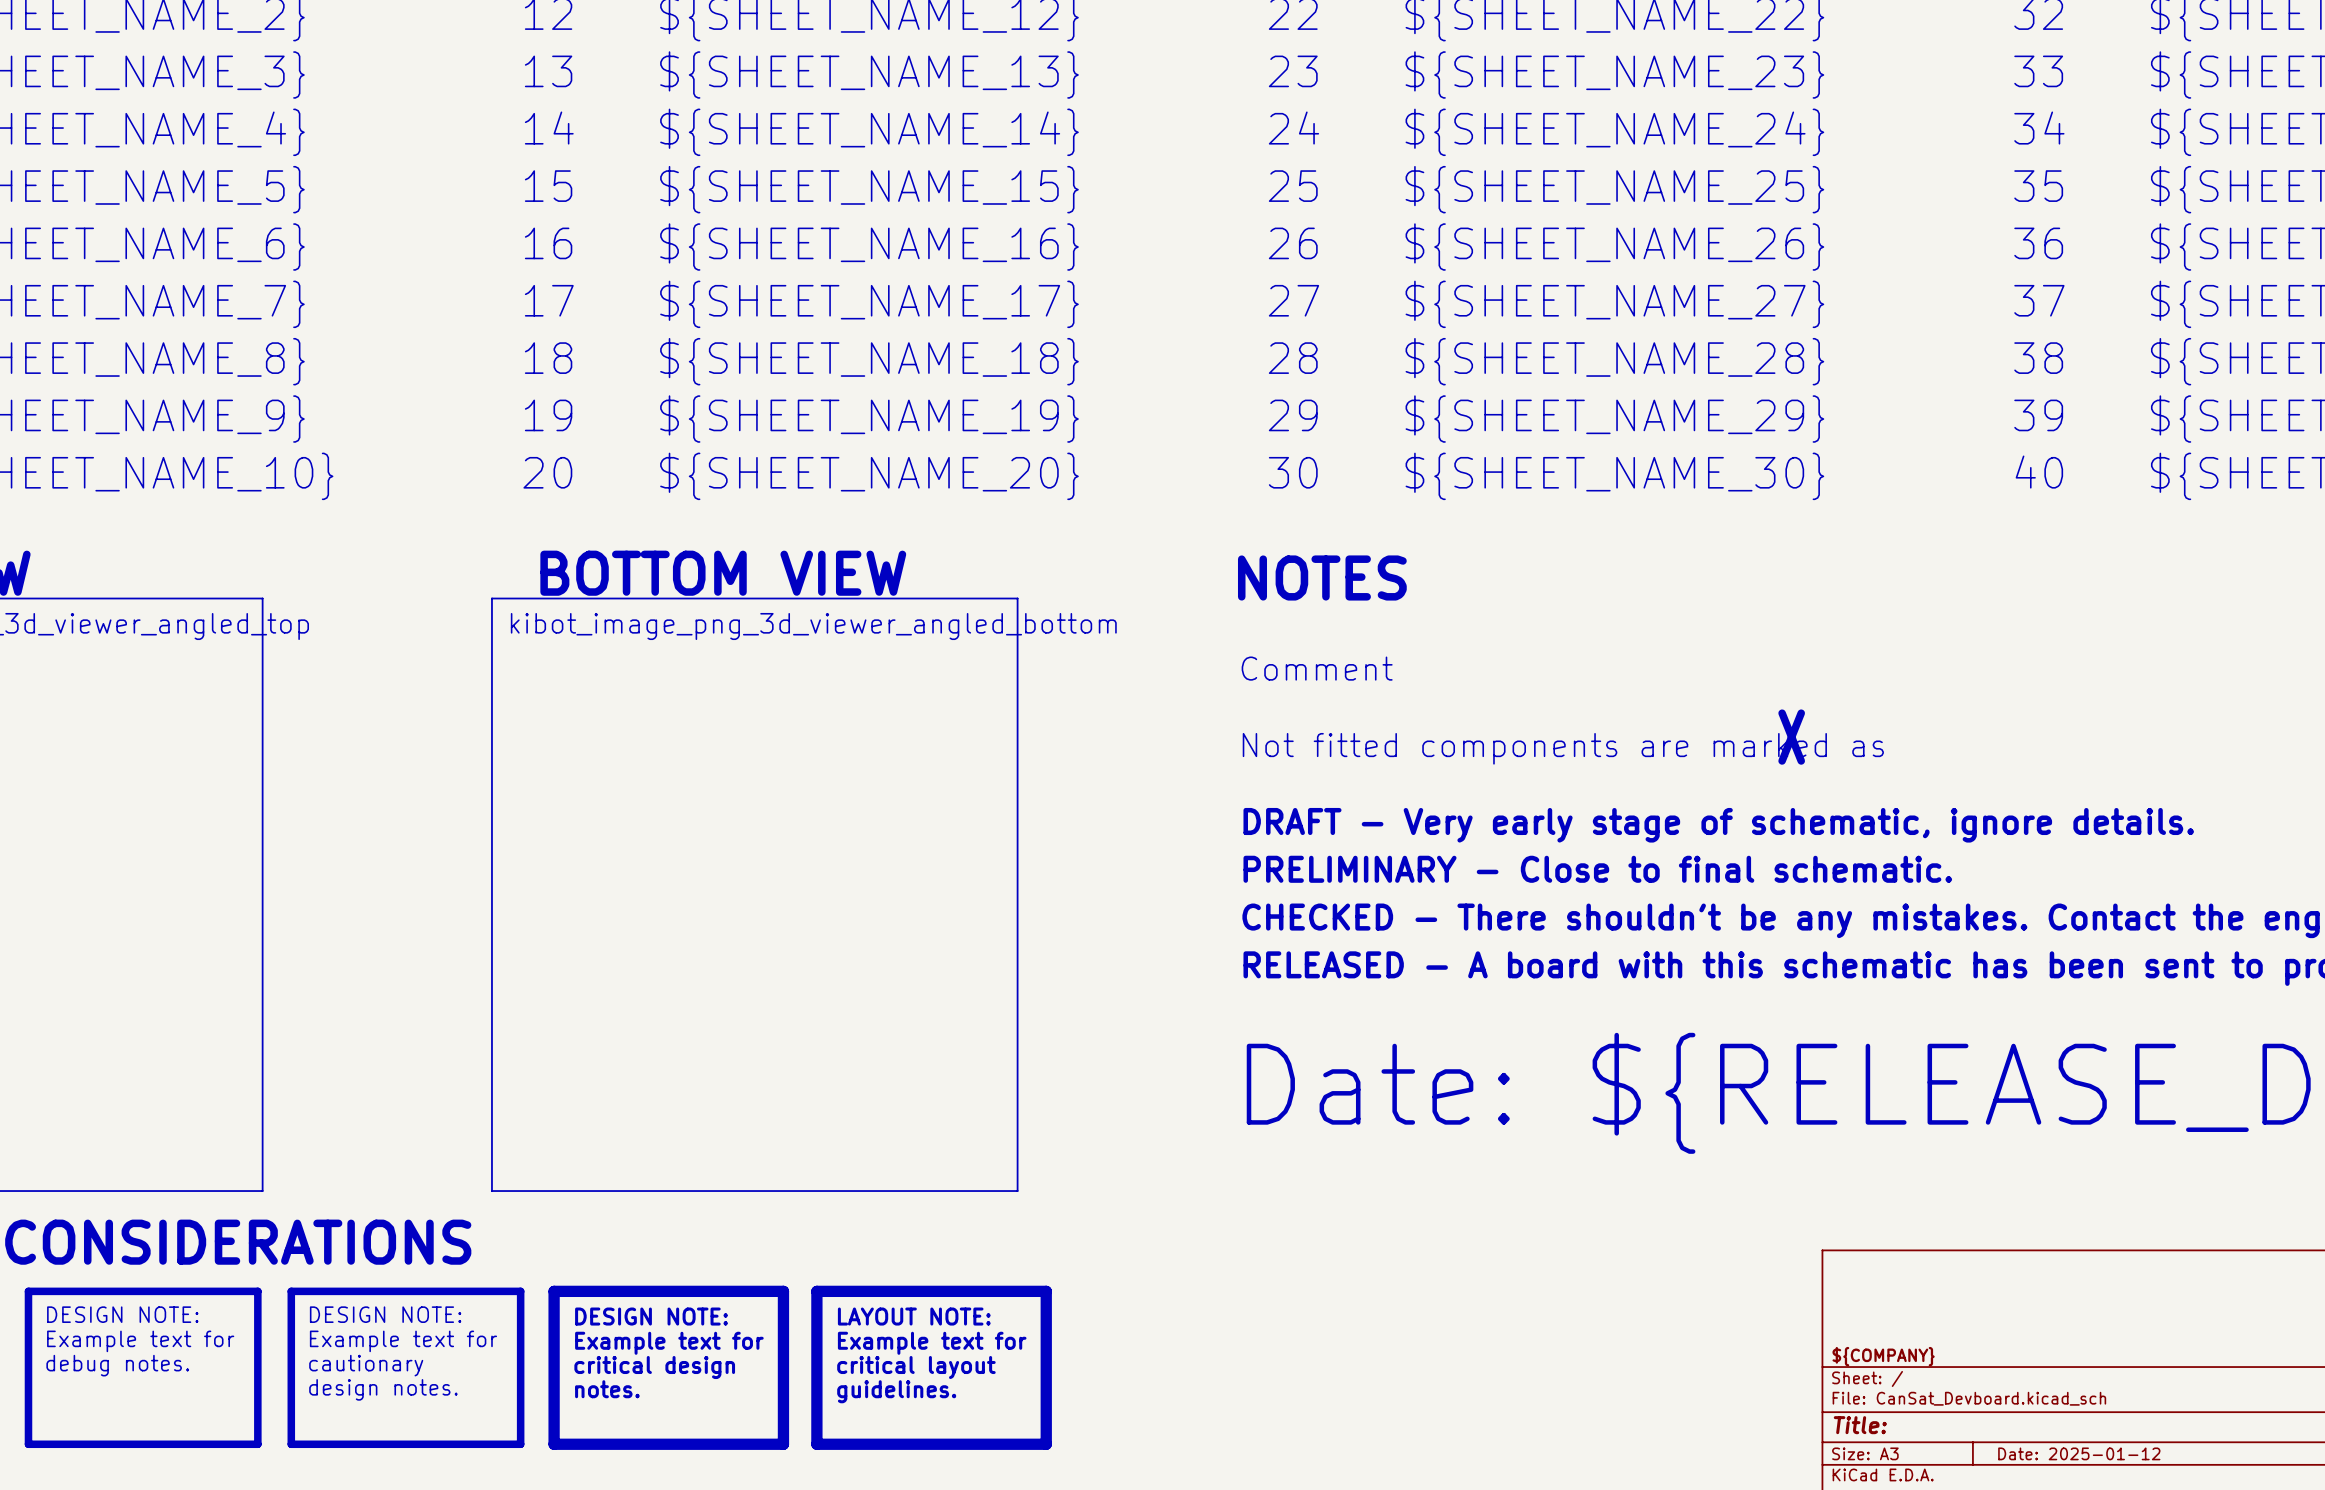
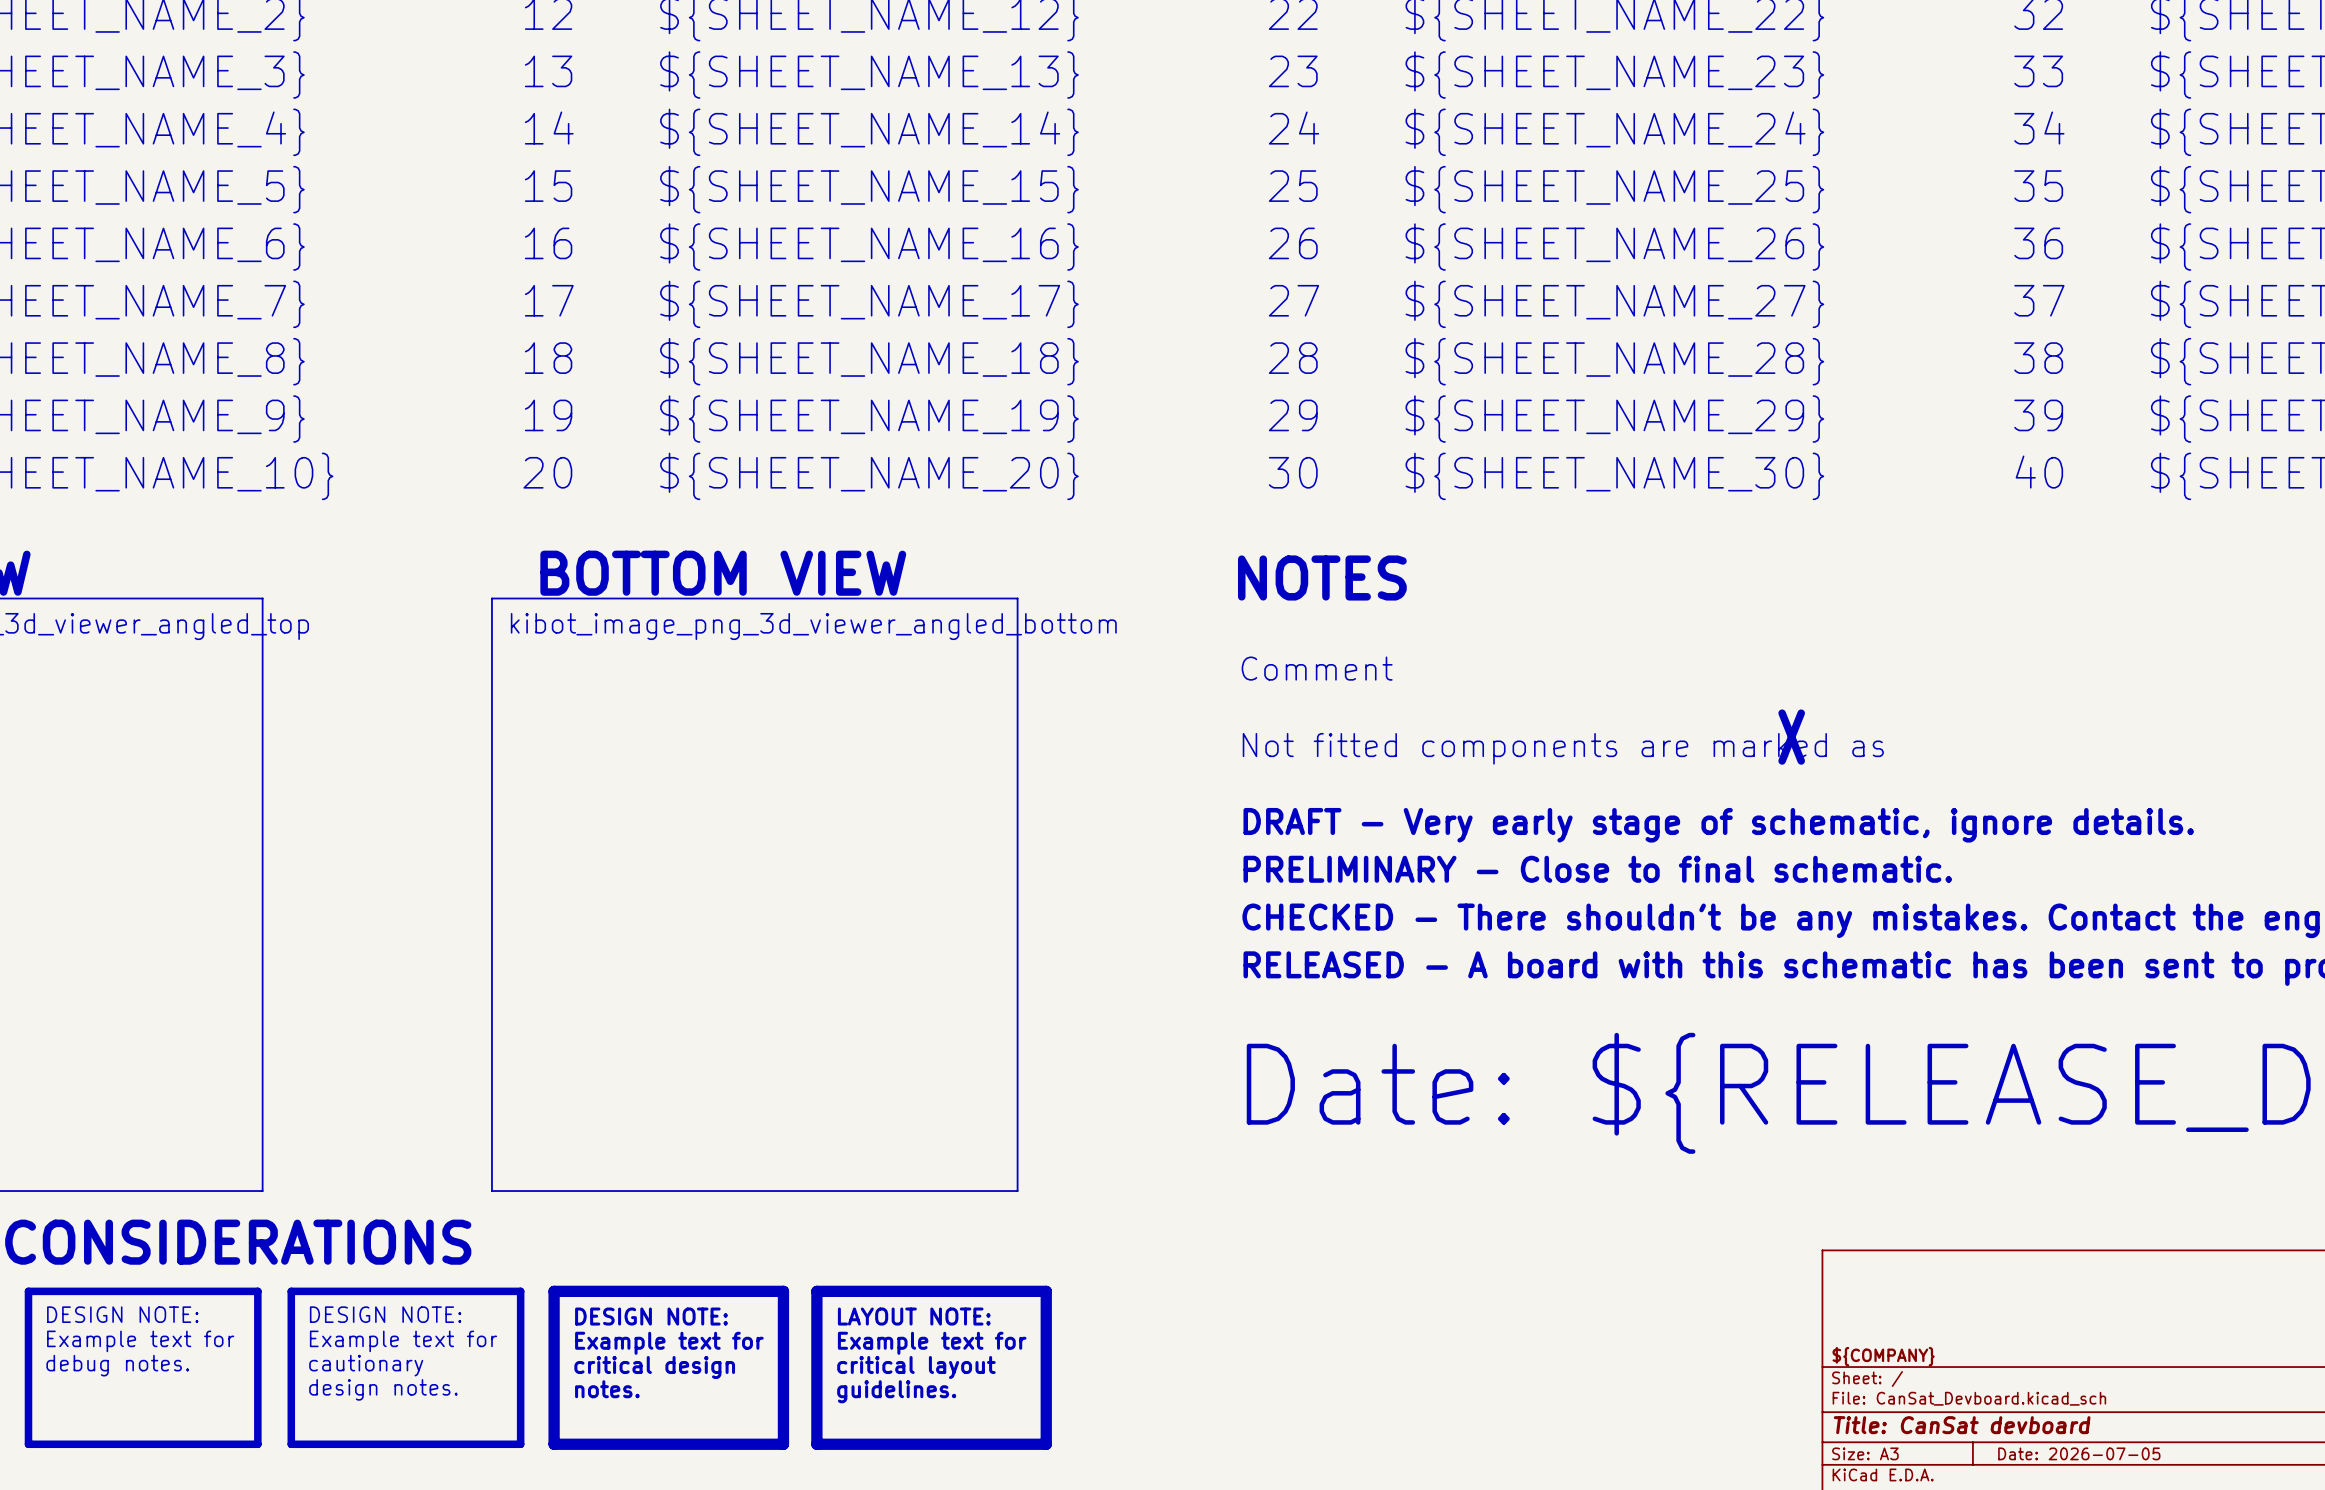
title block: Title: (1860, 1425) -> Title: CanSat devboard (1962, 1425)
title block: Date: 2025-01-12 (2079, 1453) -> Date: 2026-07-05 (2079, 1453)

